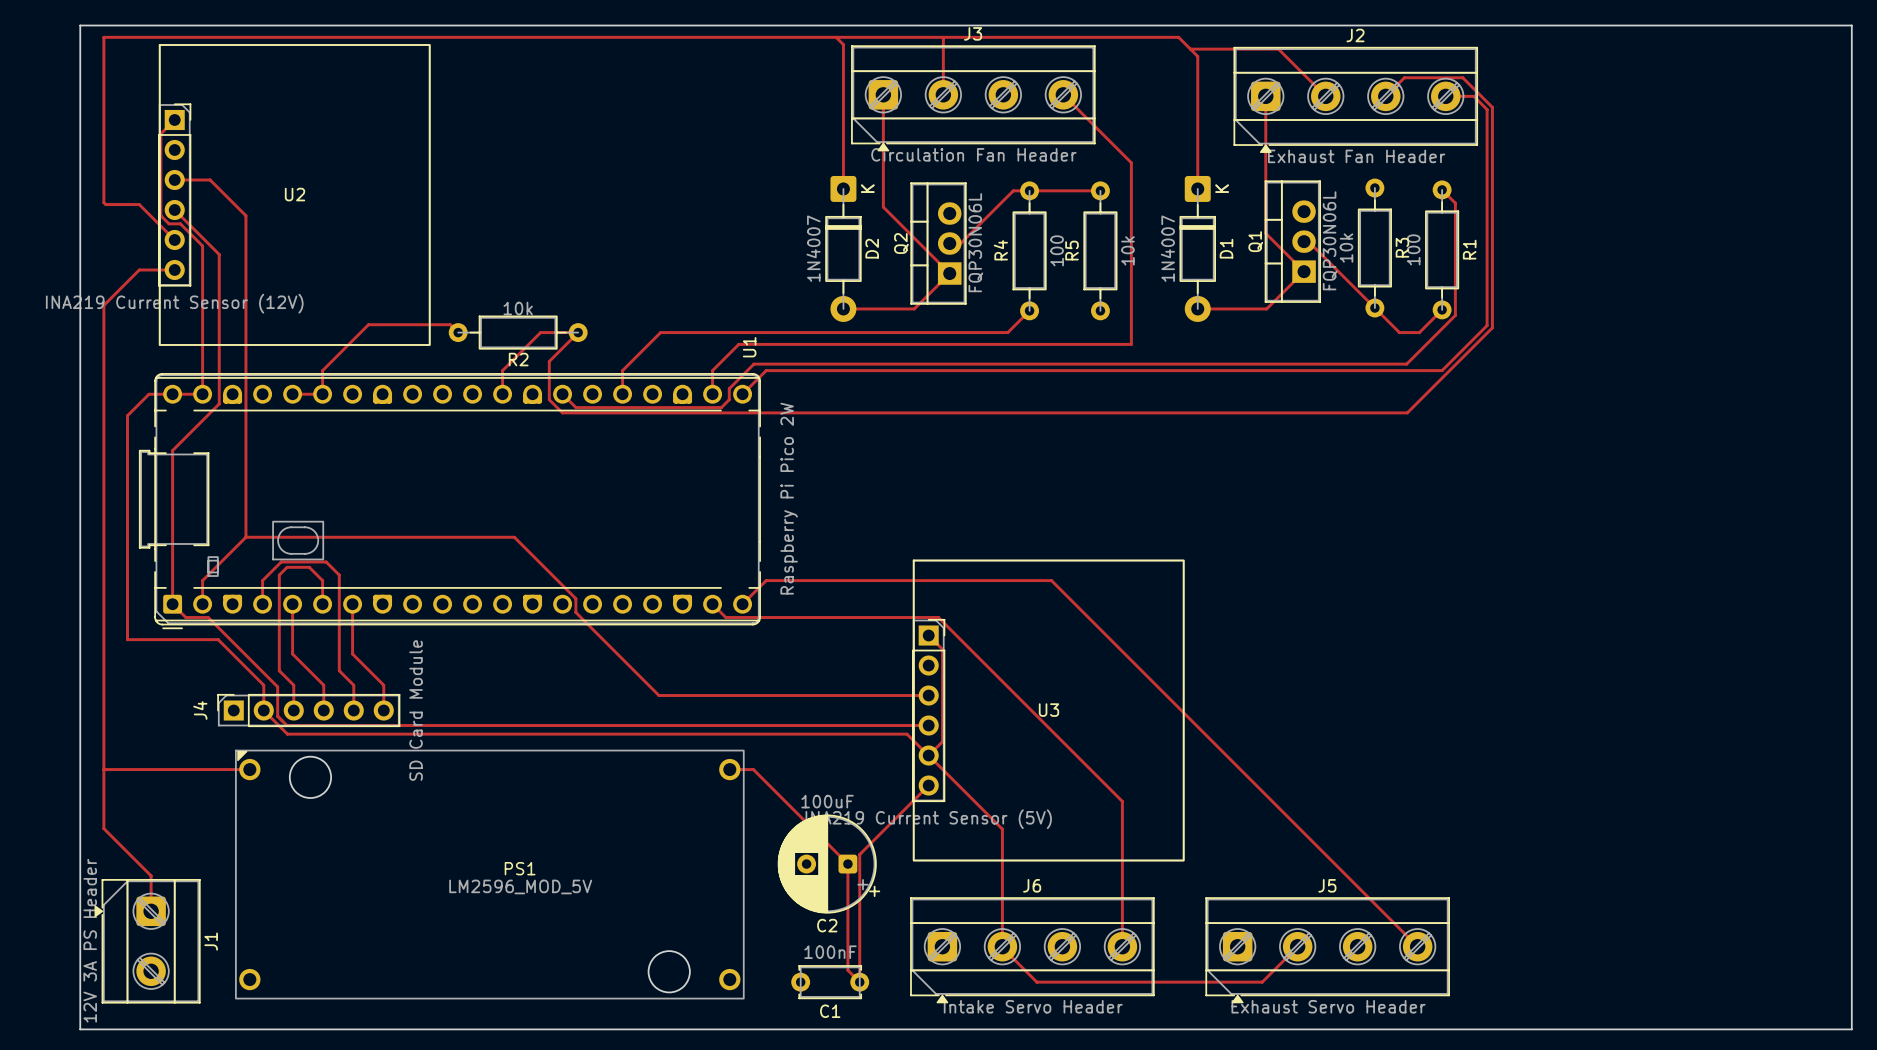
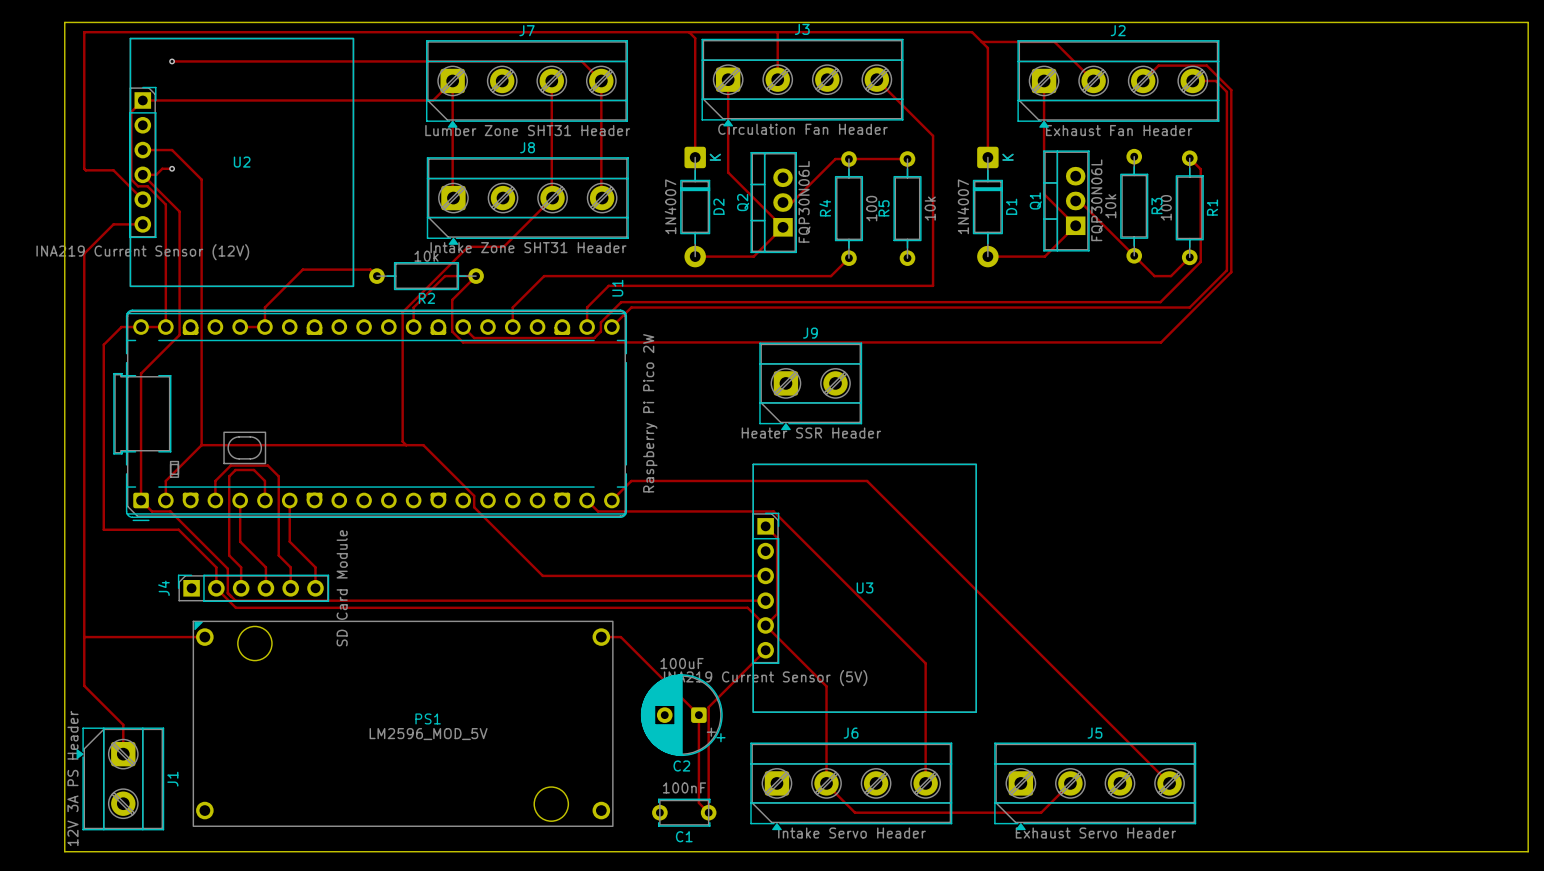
track: none -> (172, 61) (581, 61) (601, 80) (602, 198)
via: none -> (172, 61)
track: none -> (551, 80) (552, 198) (503, 246) (468, 246) (402, 312) (402, 441) (406, 445)
J7: none -> Lumber Zone SHT31 Header (527, 83)
track: none -> (142, 100) (433, 100) (452, 80) (453, 198)
track: none -> (172, 168) (162, 168) (156, 174) (142, 174)
via: none -> (172, 168)
J8: none -> Intake Zone SHT31 Header (527, 201)
J9: none -> Heater SSR Header (810, 386)

